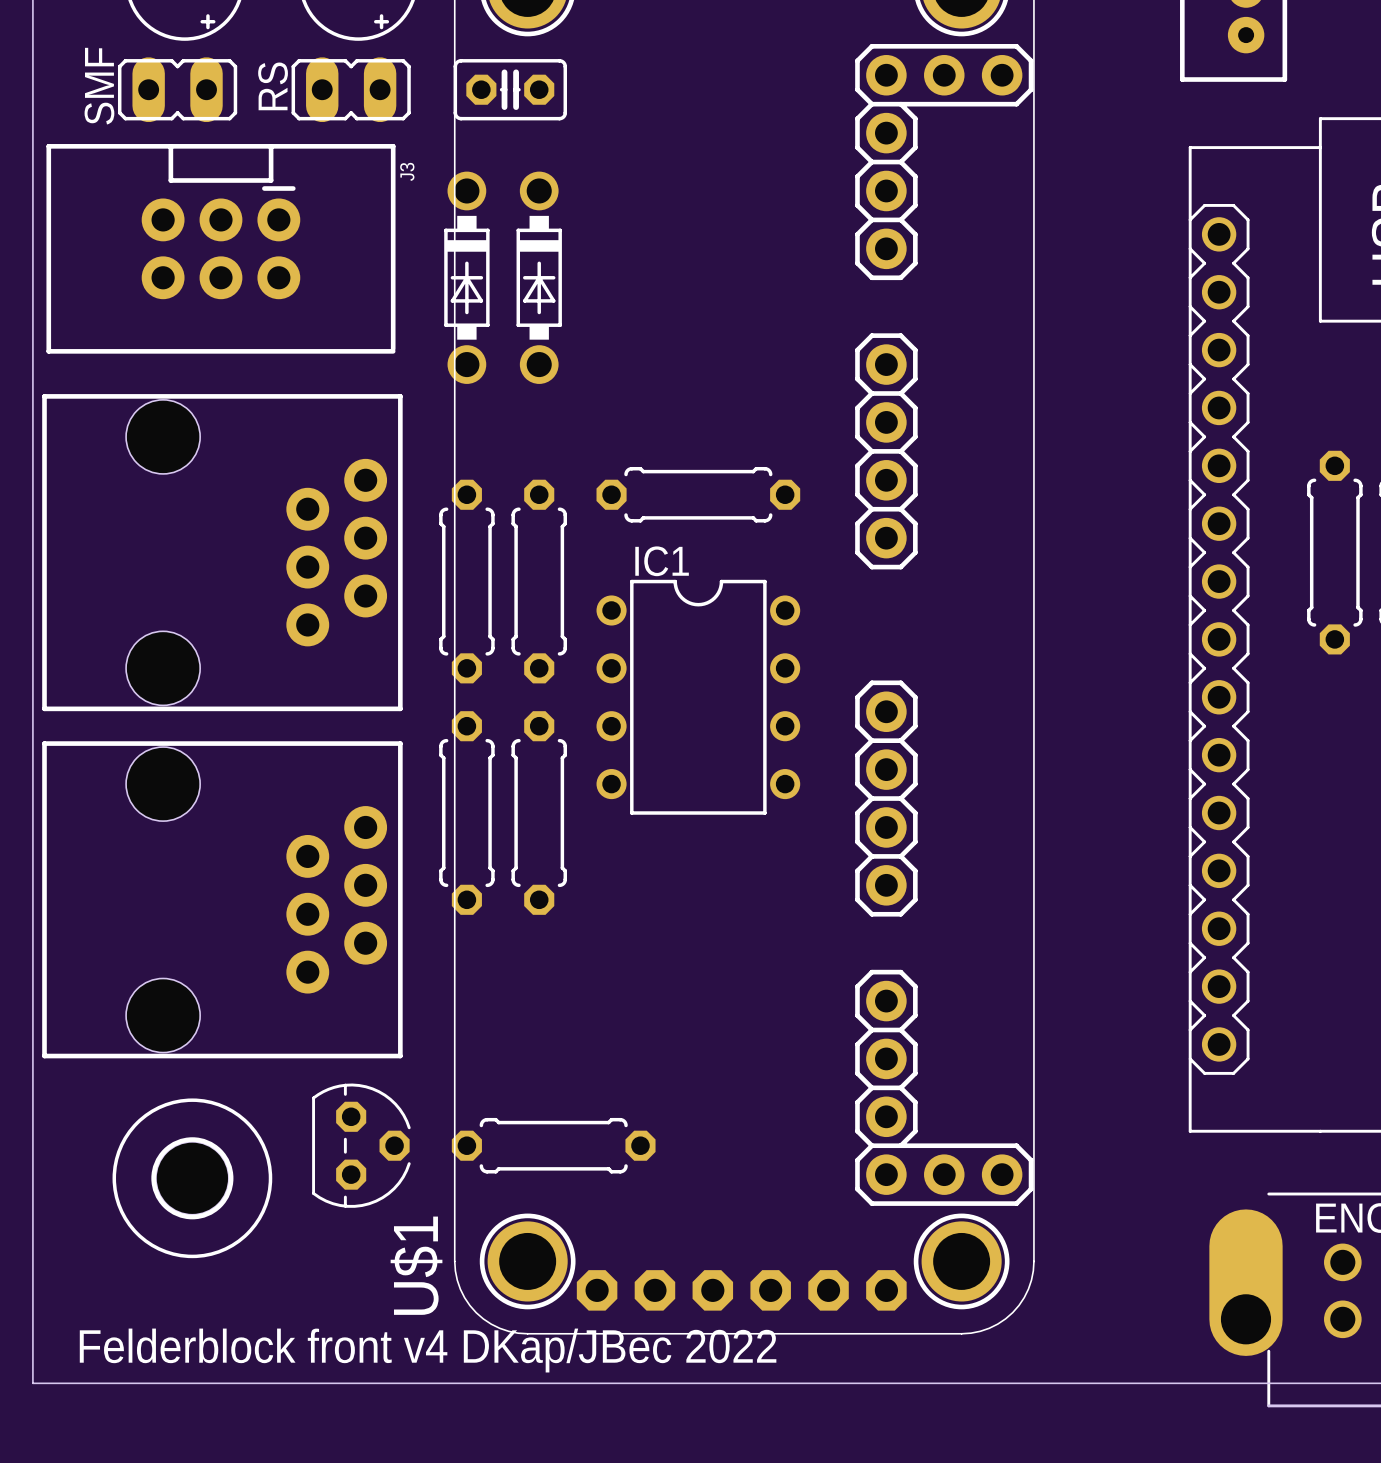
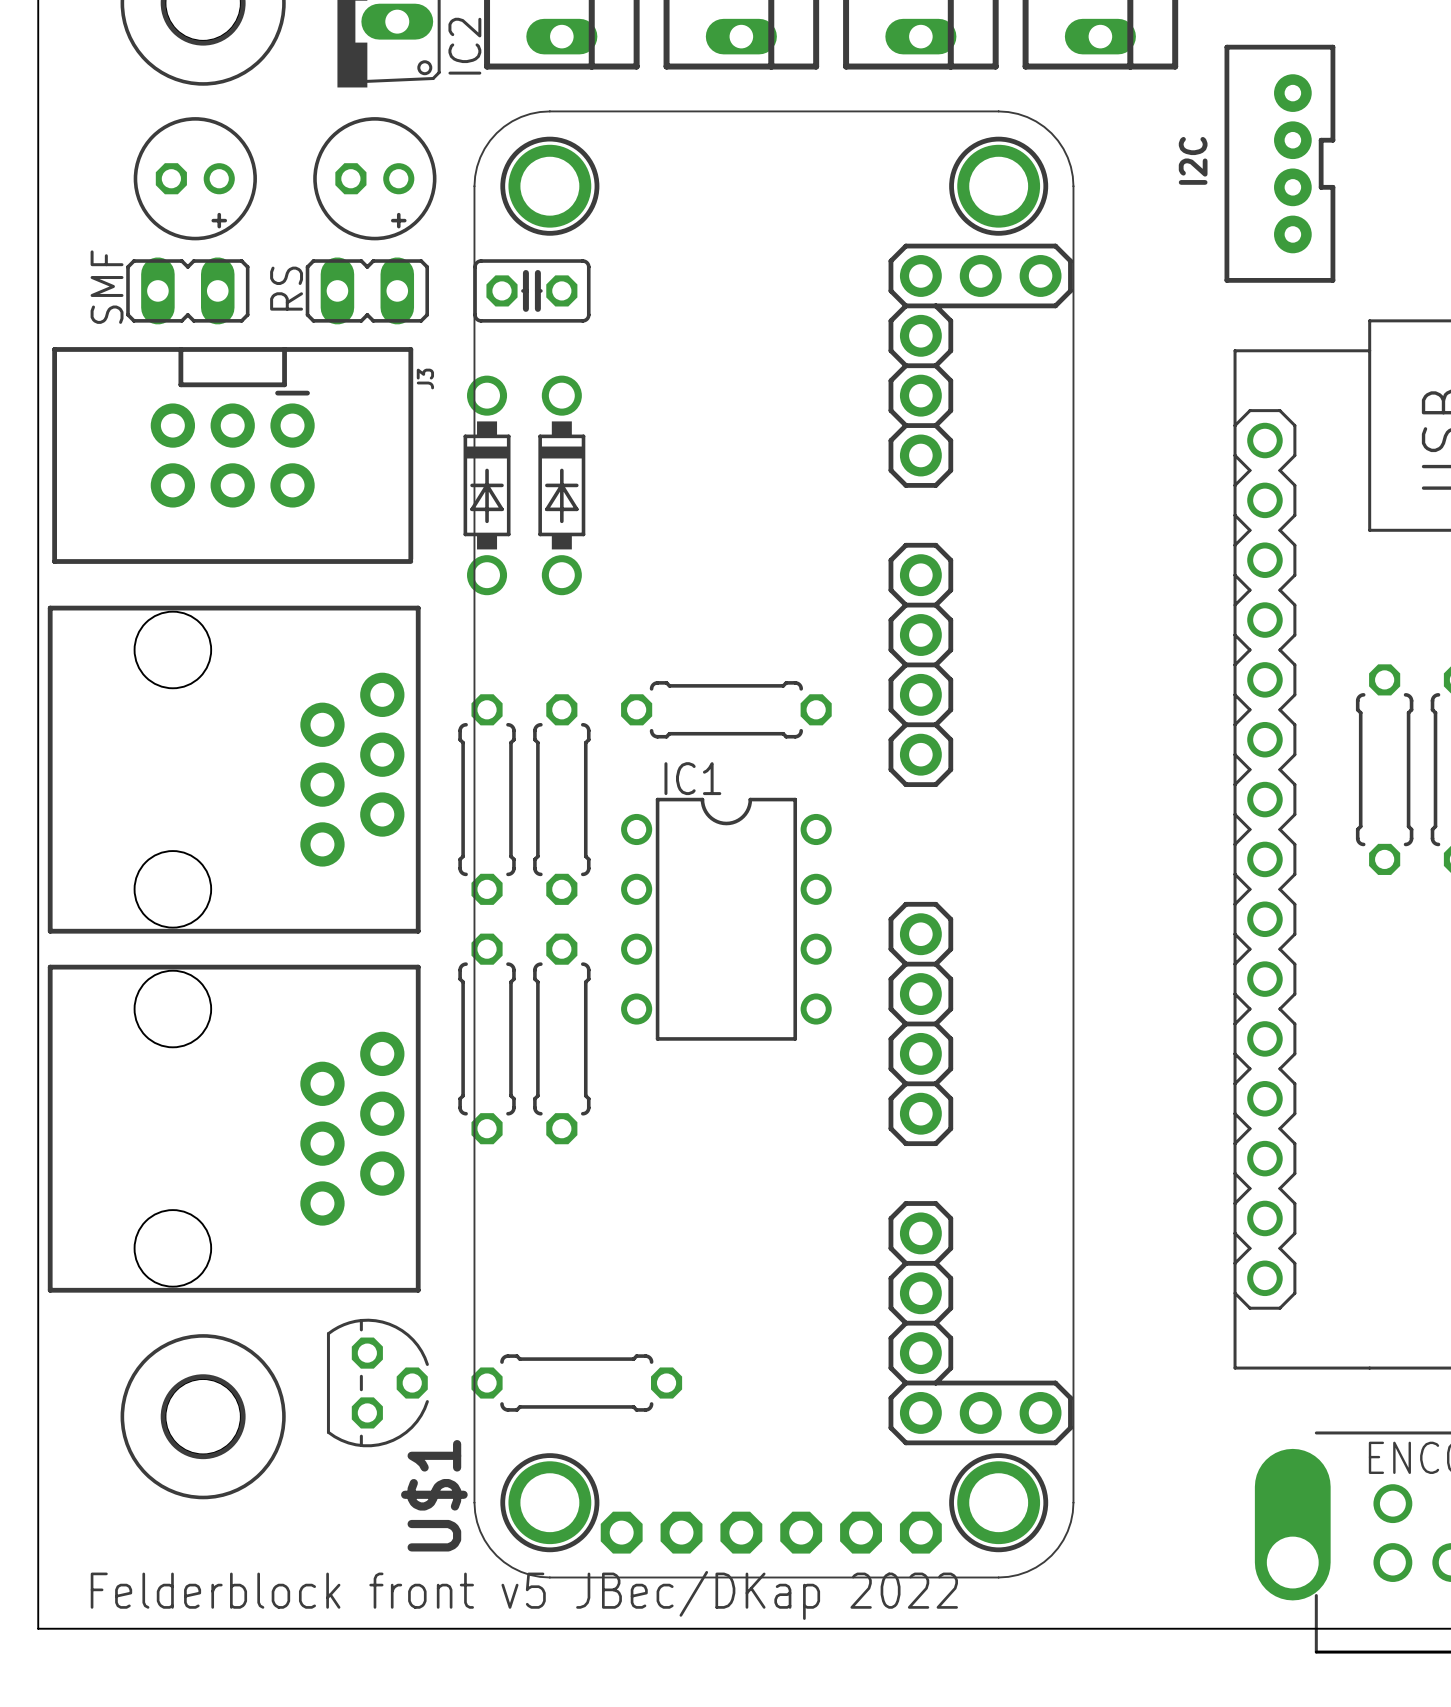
text: Felderblock front v4 DKap/JBec 2022 (428, 1350) -> Felderblock front v5 JBec/DKap 2022 (524, 1595)

